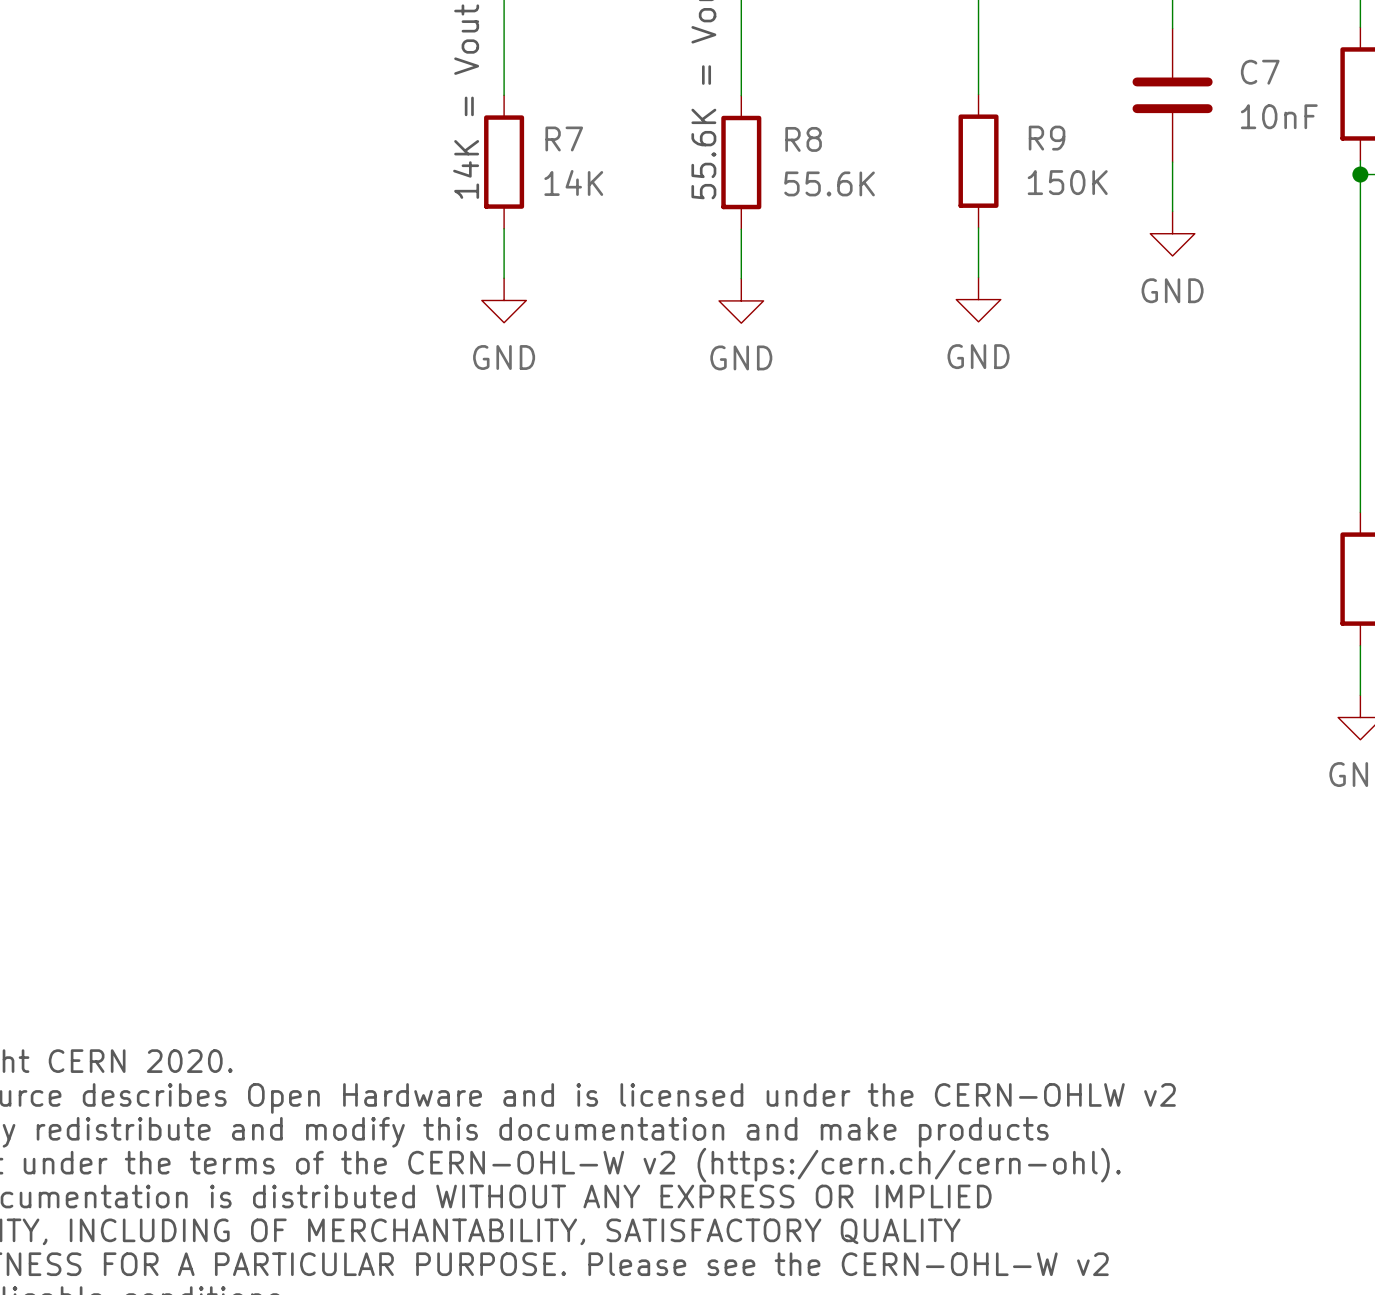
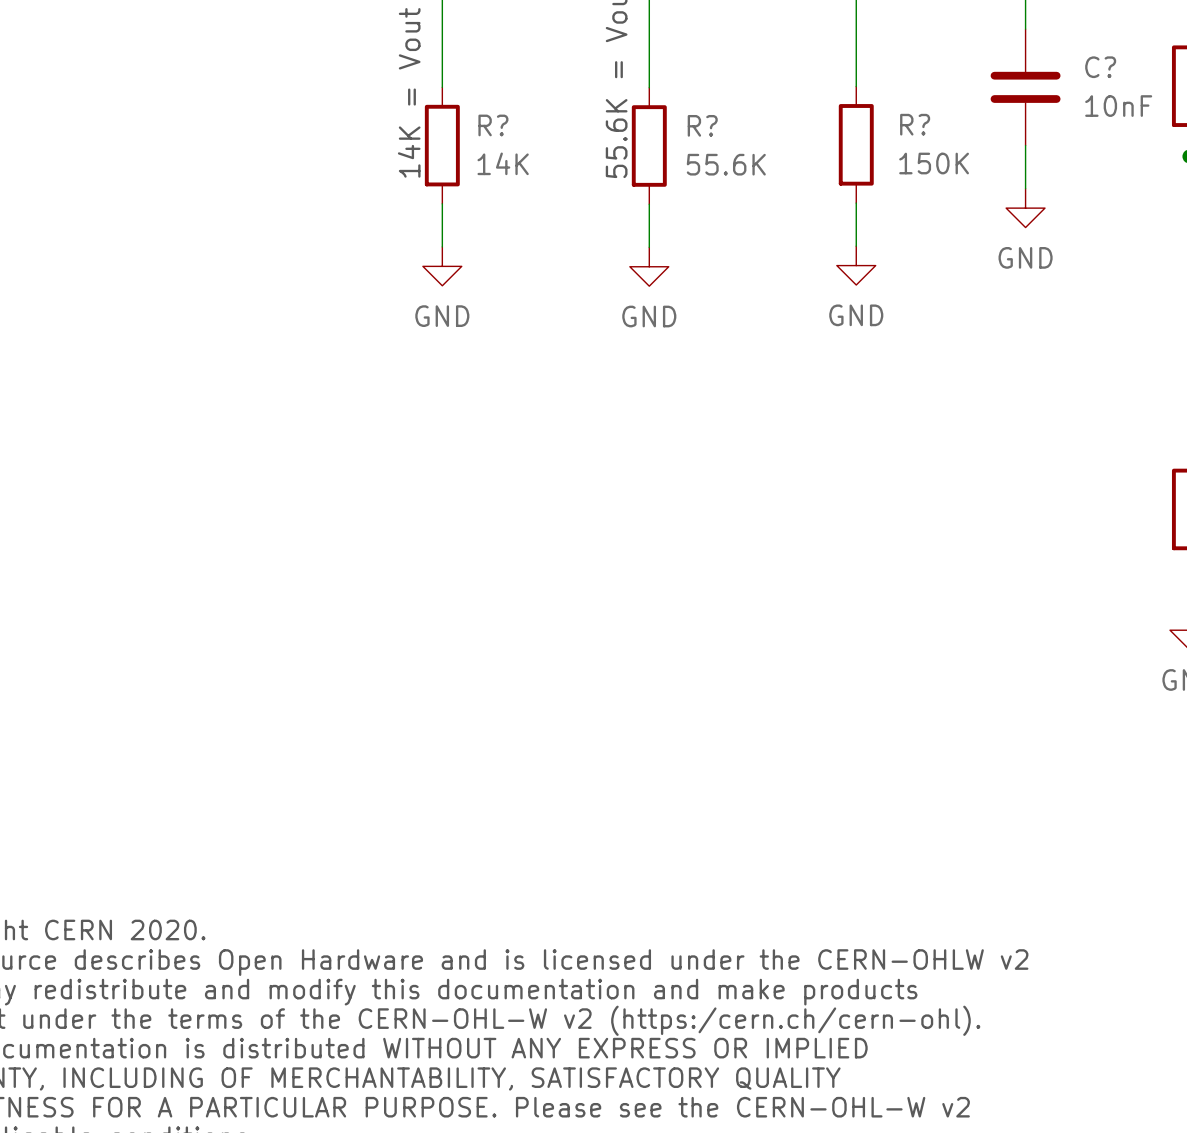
C7 name: C7 (1260, 72) -> C? (1100, 67)
R7 name: R7 (564, 138) -> R? (493, 125)
R9 name: R9 (1047, 138) -> R? (915, 124)
R8 name: R8 (803, 139) -> R? (702, 125)

